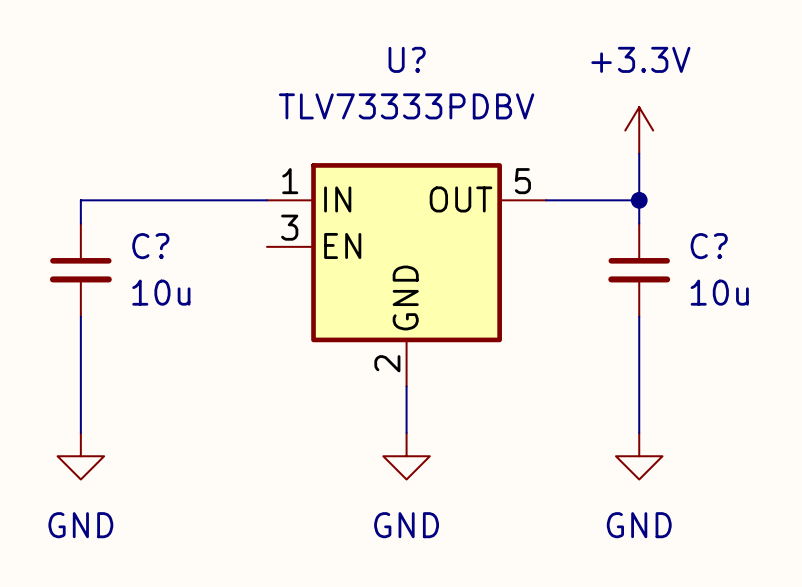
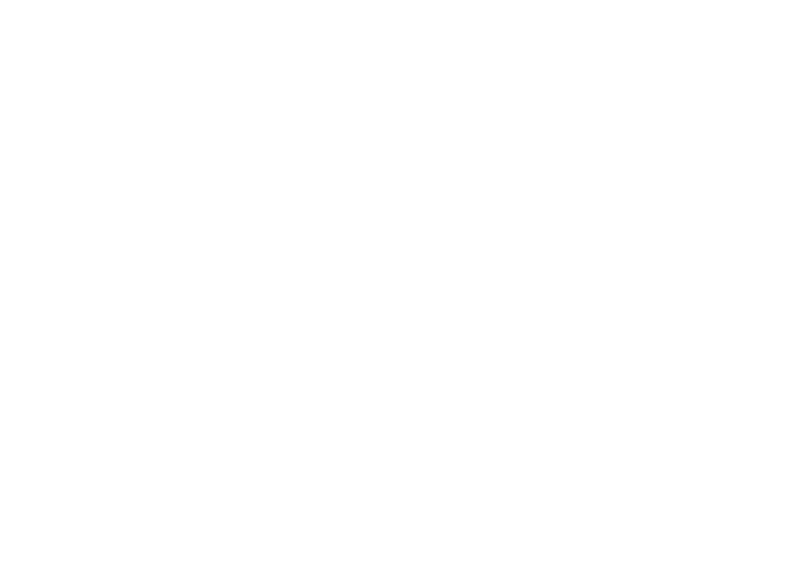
power symbol: +3.3V (639, 130) -> none
wire: (639, 153) (639, 223) -> none
wire: (266, 200) (80, 200) (80, 223) -> none
wire: (546, 200) (639, 200) -> none
junction: (639, 200) -> none
C?: 10u (80, 270) -> none
C?: 10u (639, 270) -> none
U?: TLV73333PDBV (406, 274) -> none
wire: (80, 316) (80, 432) -> none
wire: (639, 316) (639, 432) -> none
wire: (406, 386) (406, 432) -> none
power symbol: GND (80, 456) -> none
power symbol: GND (406, 456) -> none
power symbol: GND (639, 456) -> none

